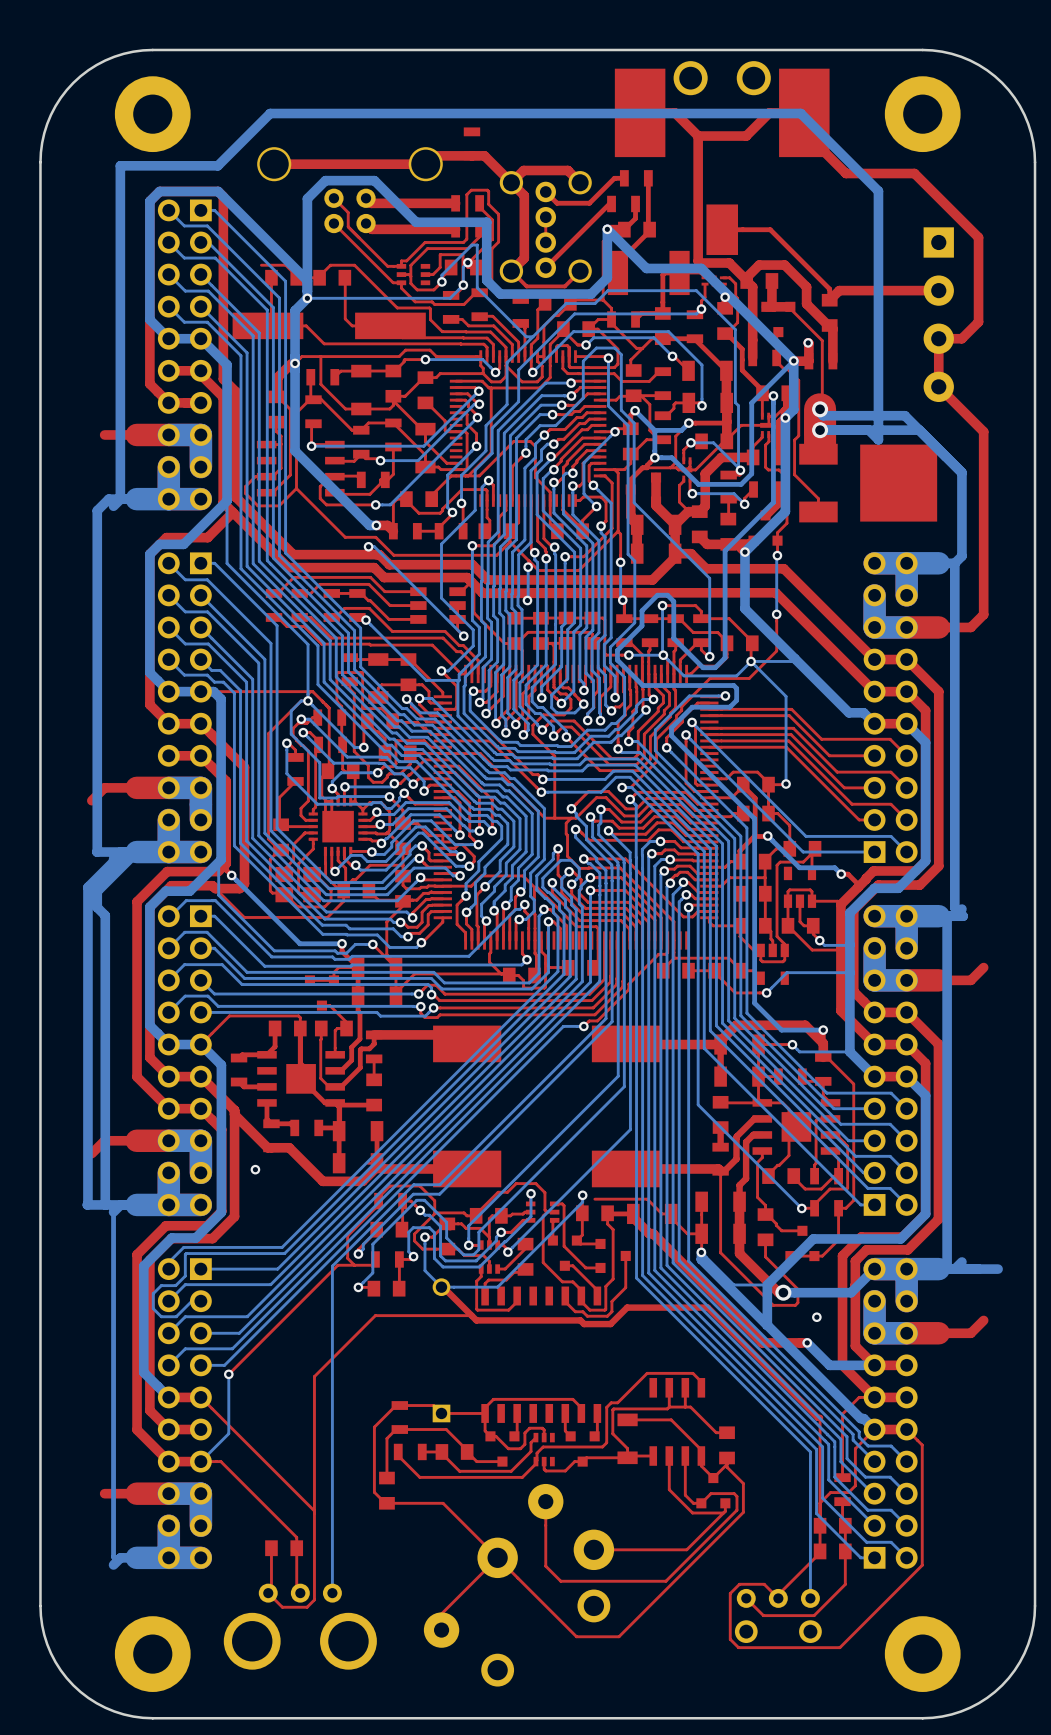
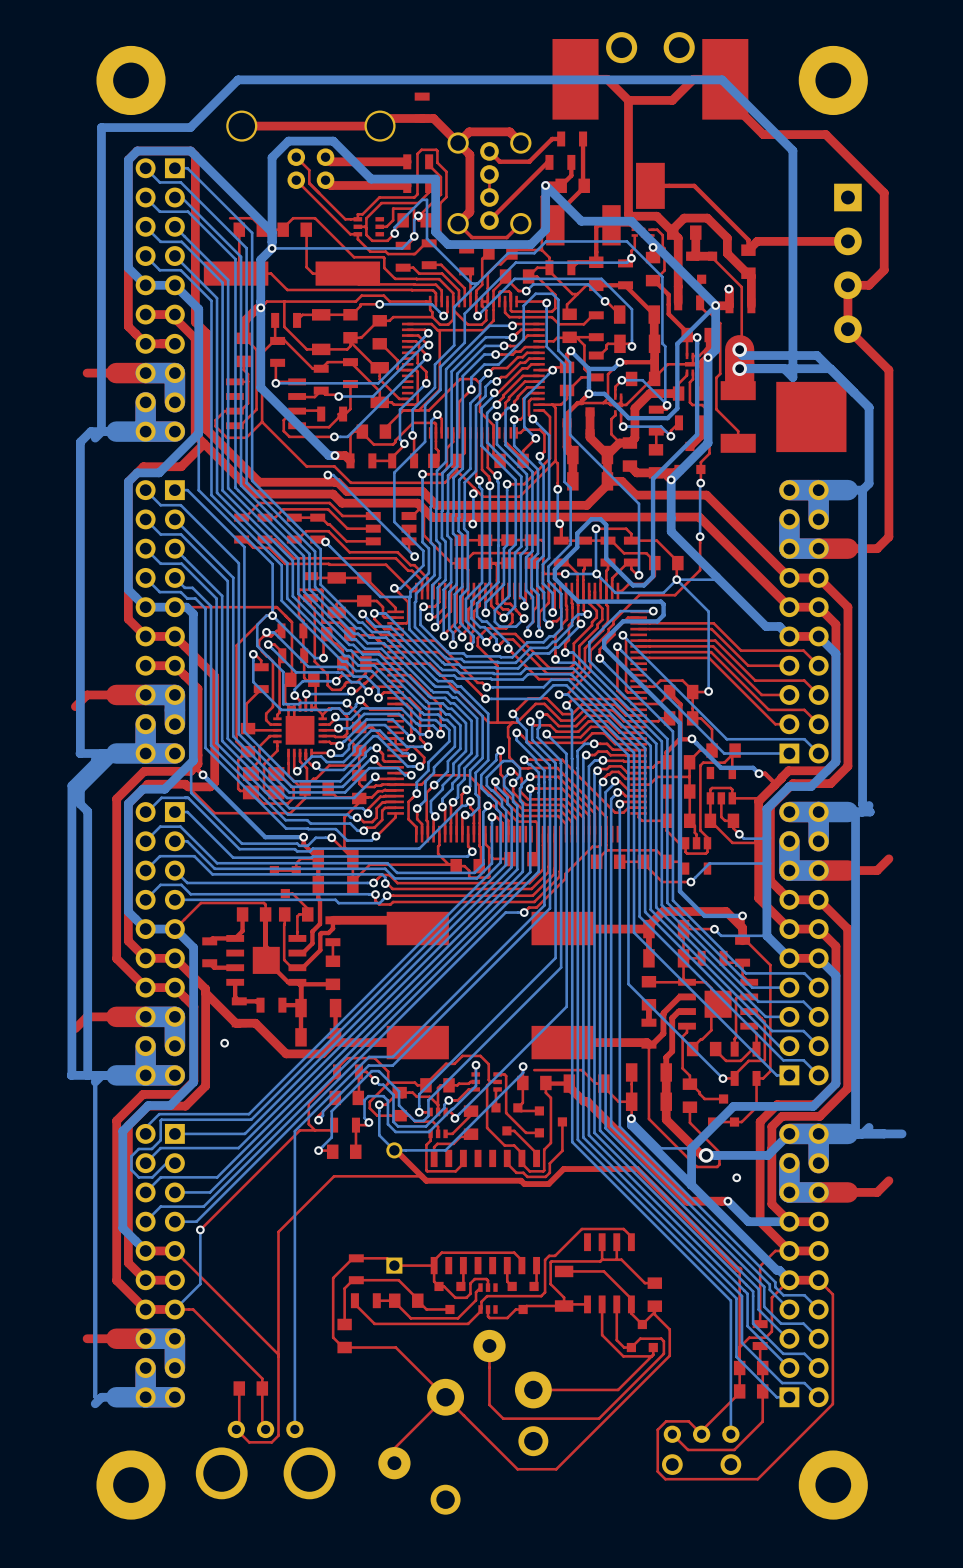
board edge: (922, 49) (142, 50) (114, 56) (88, 70) (66, 90) (51, 114) (42, 142) (40, 162) (40, 1605) (44, 1635) (55, 1662) (66, 1678) (80, 1691) (105, 1707) (123, 1714) (152, 1718) (932, 1717) (961, 1711) (987, 1697) (1008, 1678) (1024, 1653) (1031, 1635) (1035, 1605) (1034, 152) (1031, 133) (1024, 114) (1014, 97) (1002, 82) (978, 65) (961, 56) (942, 51) (922, 49) -> none

